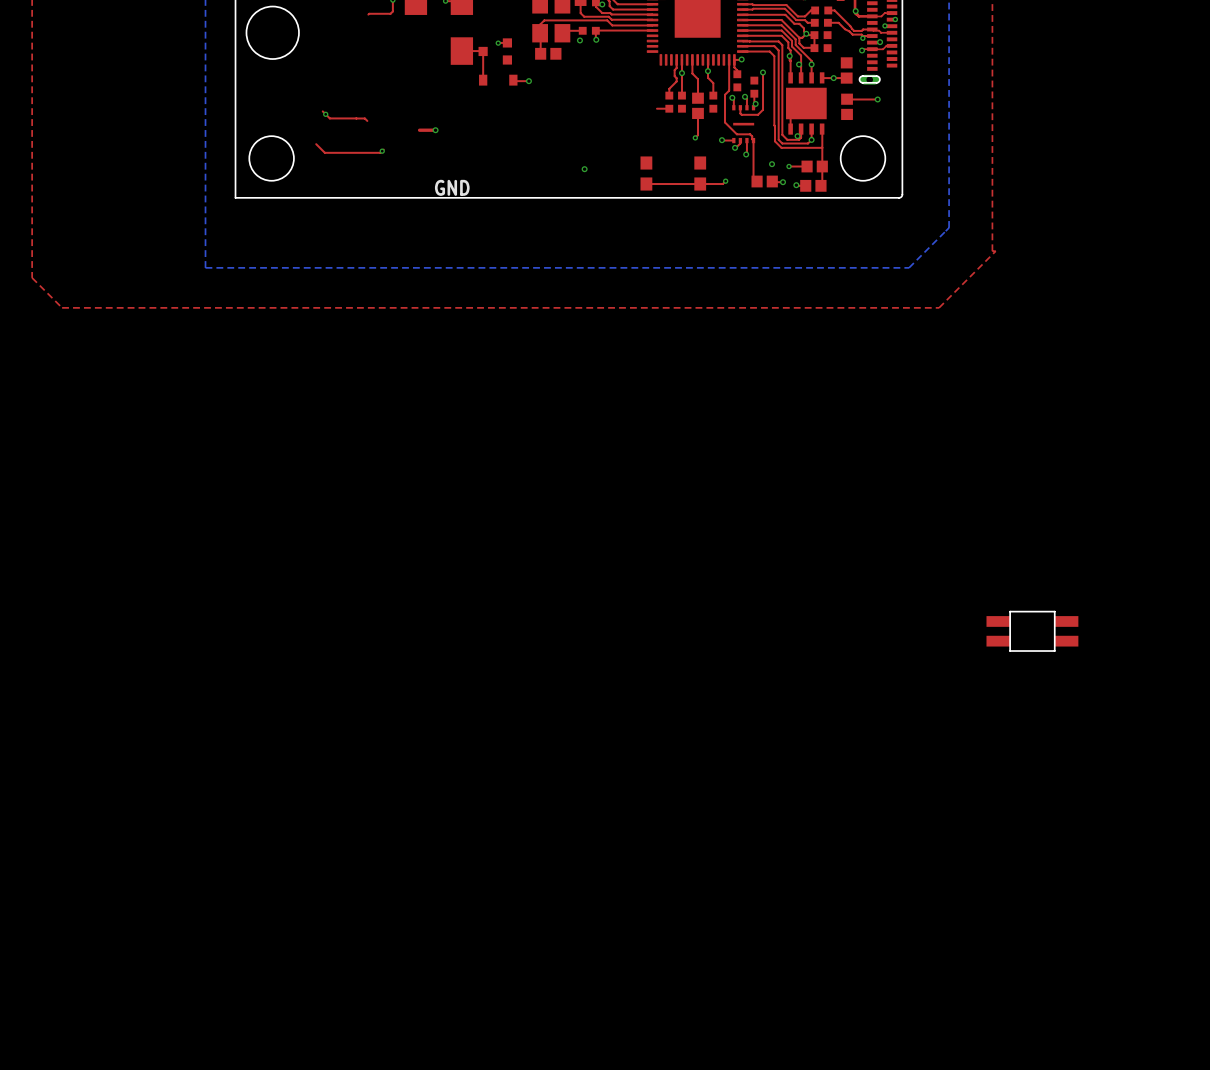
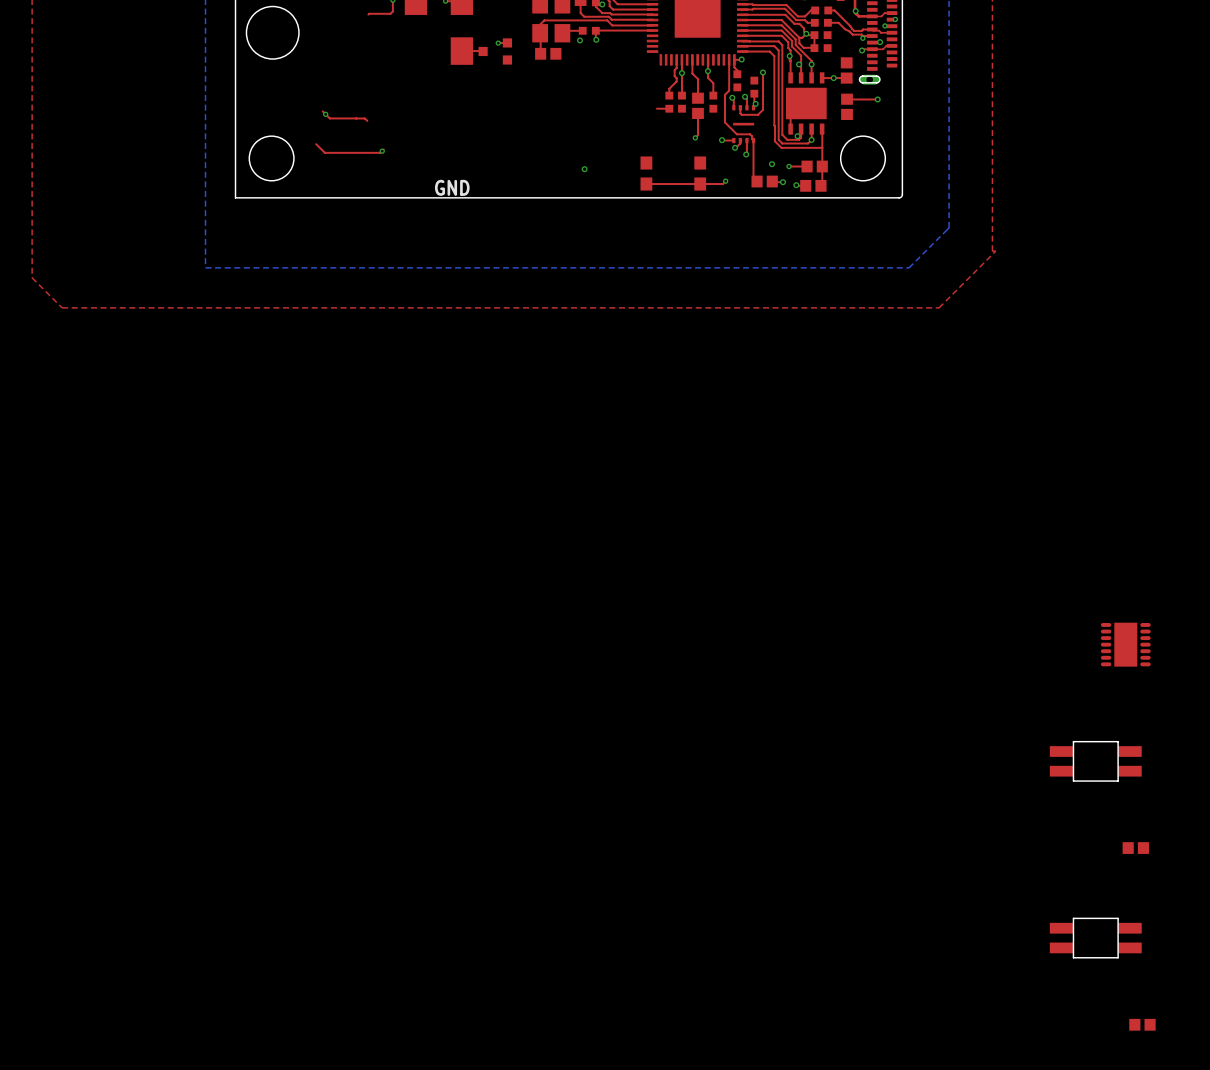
top track: (483, 51) (483, 80) -> none
part: (498, 80) -> none
top track: (513, 80) (528, 81) -> none
via: (528, 81) -> none
top track: (435, 130) (419, 130) -> none
via: (435, 130) -> none
part position: (1032, 631) -> (1095, 761)
part: none -> (1125, 644)
part: none -> (1135, 848)
part: none -> (1095, 938)
part: none -> (1142, 1024)

